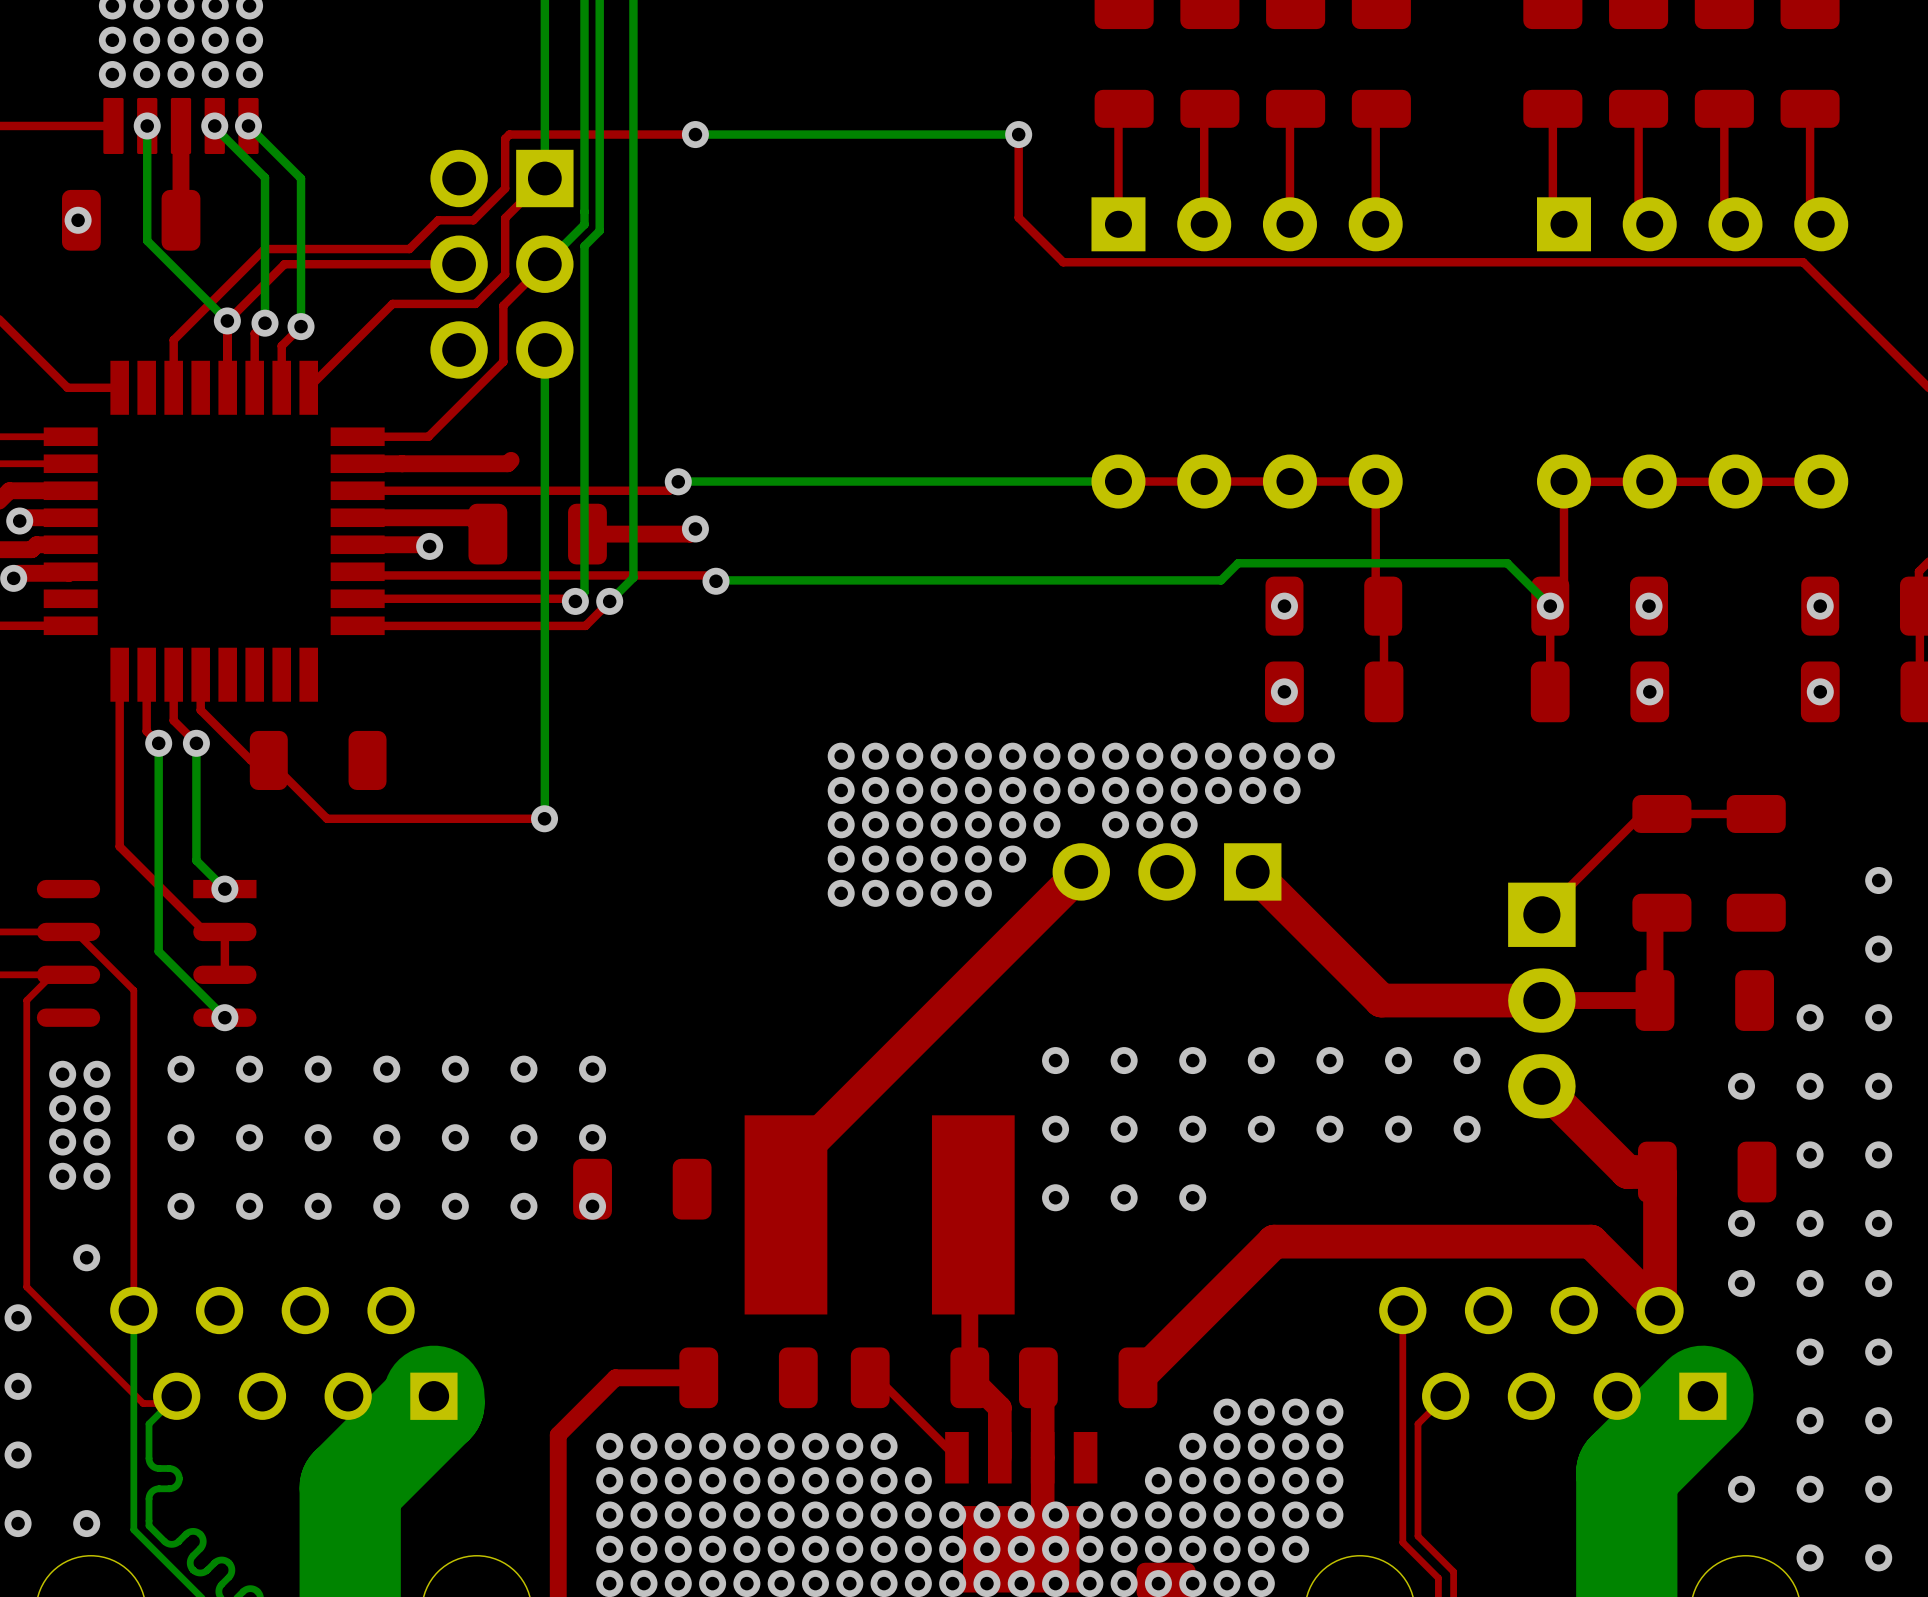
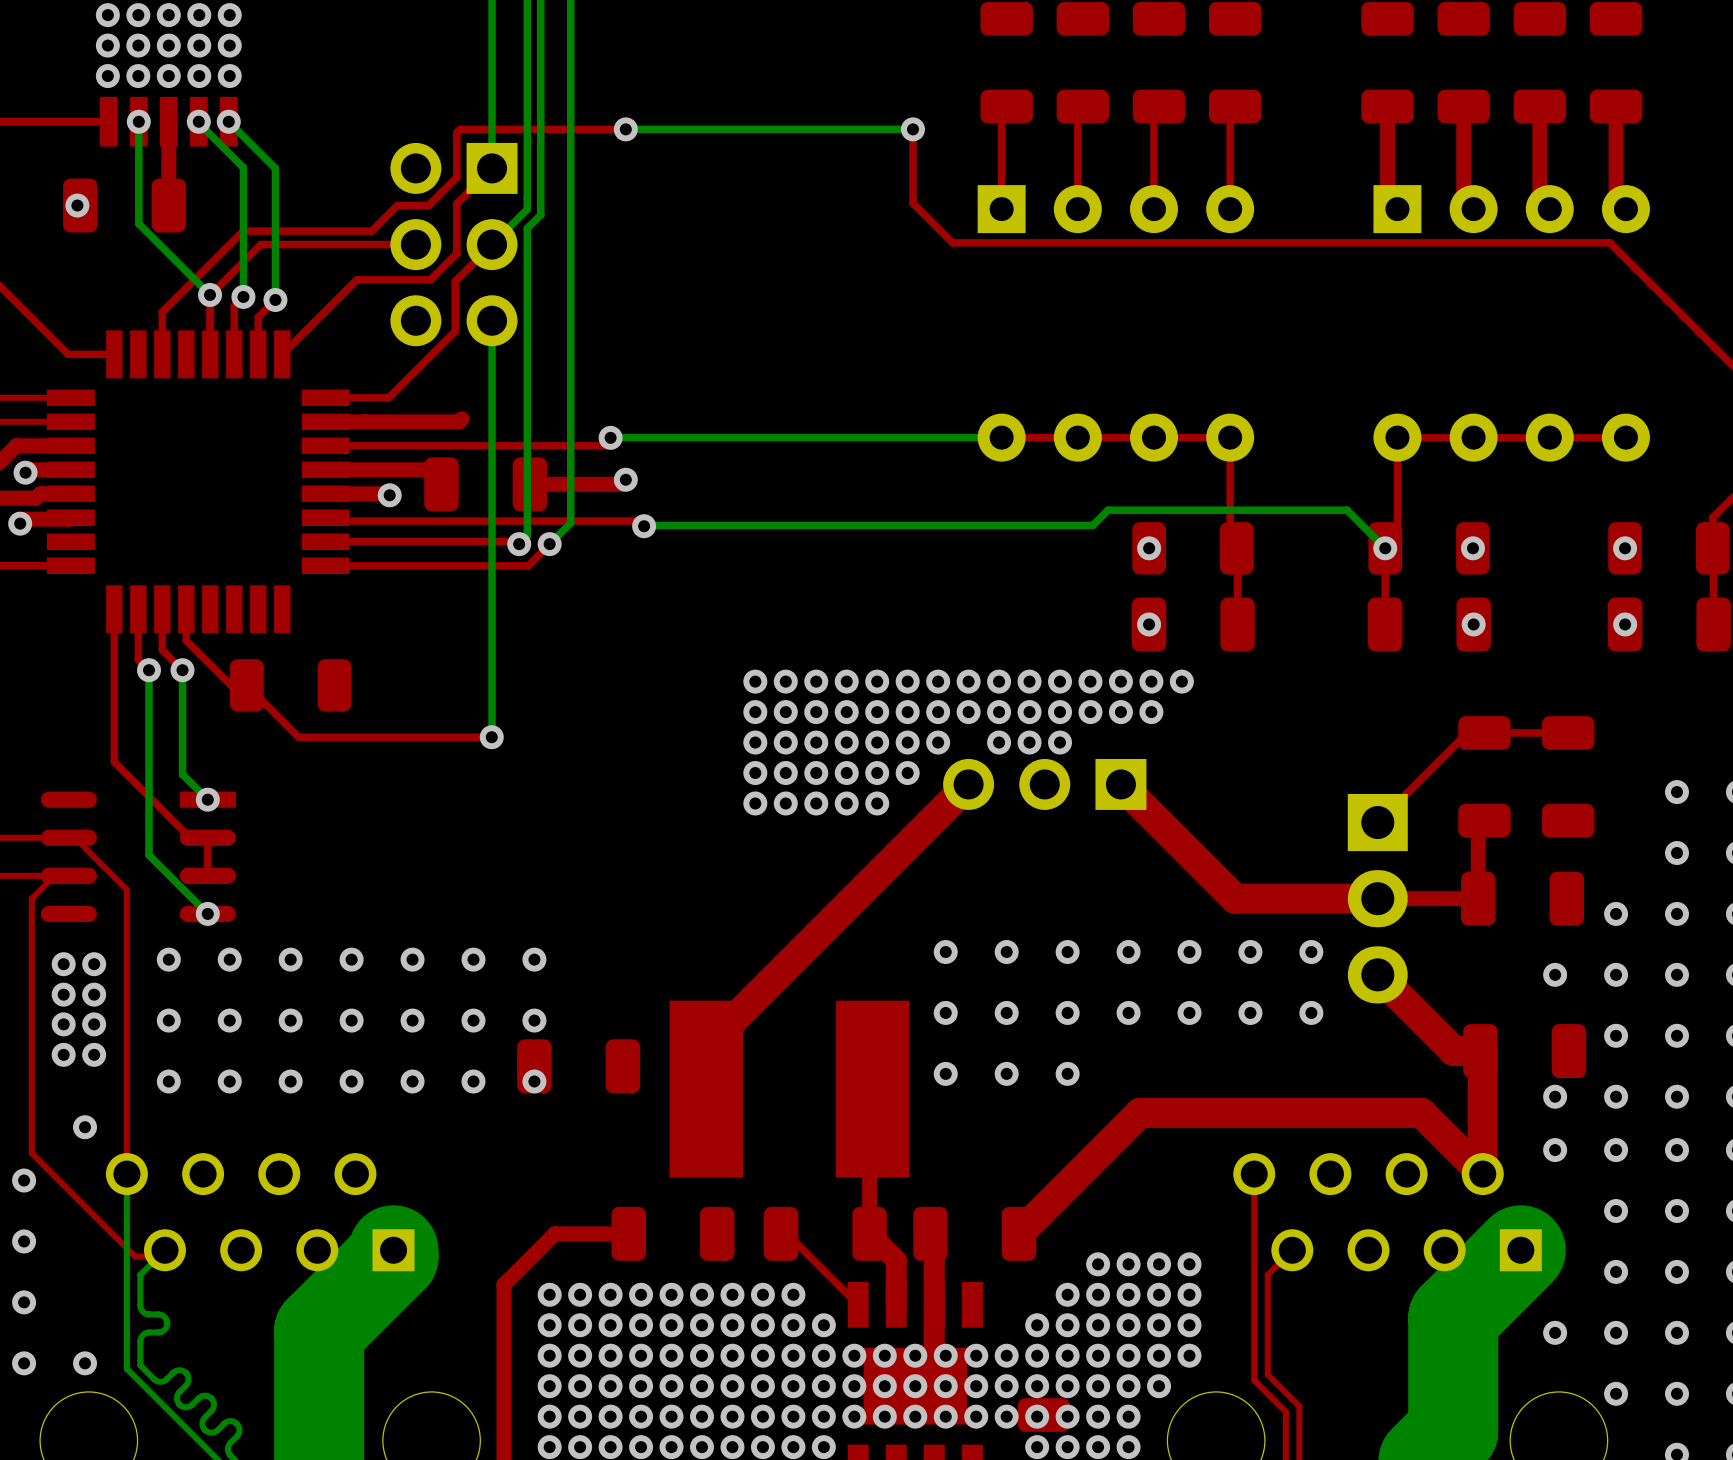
top track width: thin (1552, 108) (1552, 205) -> thick (1387, 106) (1387, 192)
top track width: thin (1638, 108) (1638, 205) -> thick (1463, 106) (1463, 192)
top track width: thin (1724, 108) (1724, 205) -> thick (1539, 106) (1539, 192)
top track width: thin (1810, 108) (1810, 205) -> thick (1616, 106) (1616, 192)

